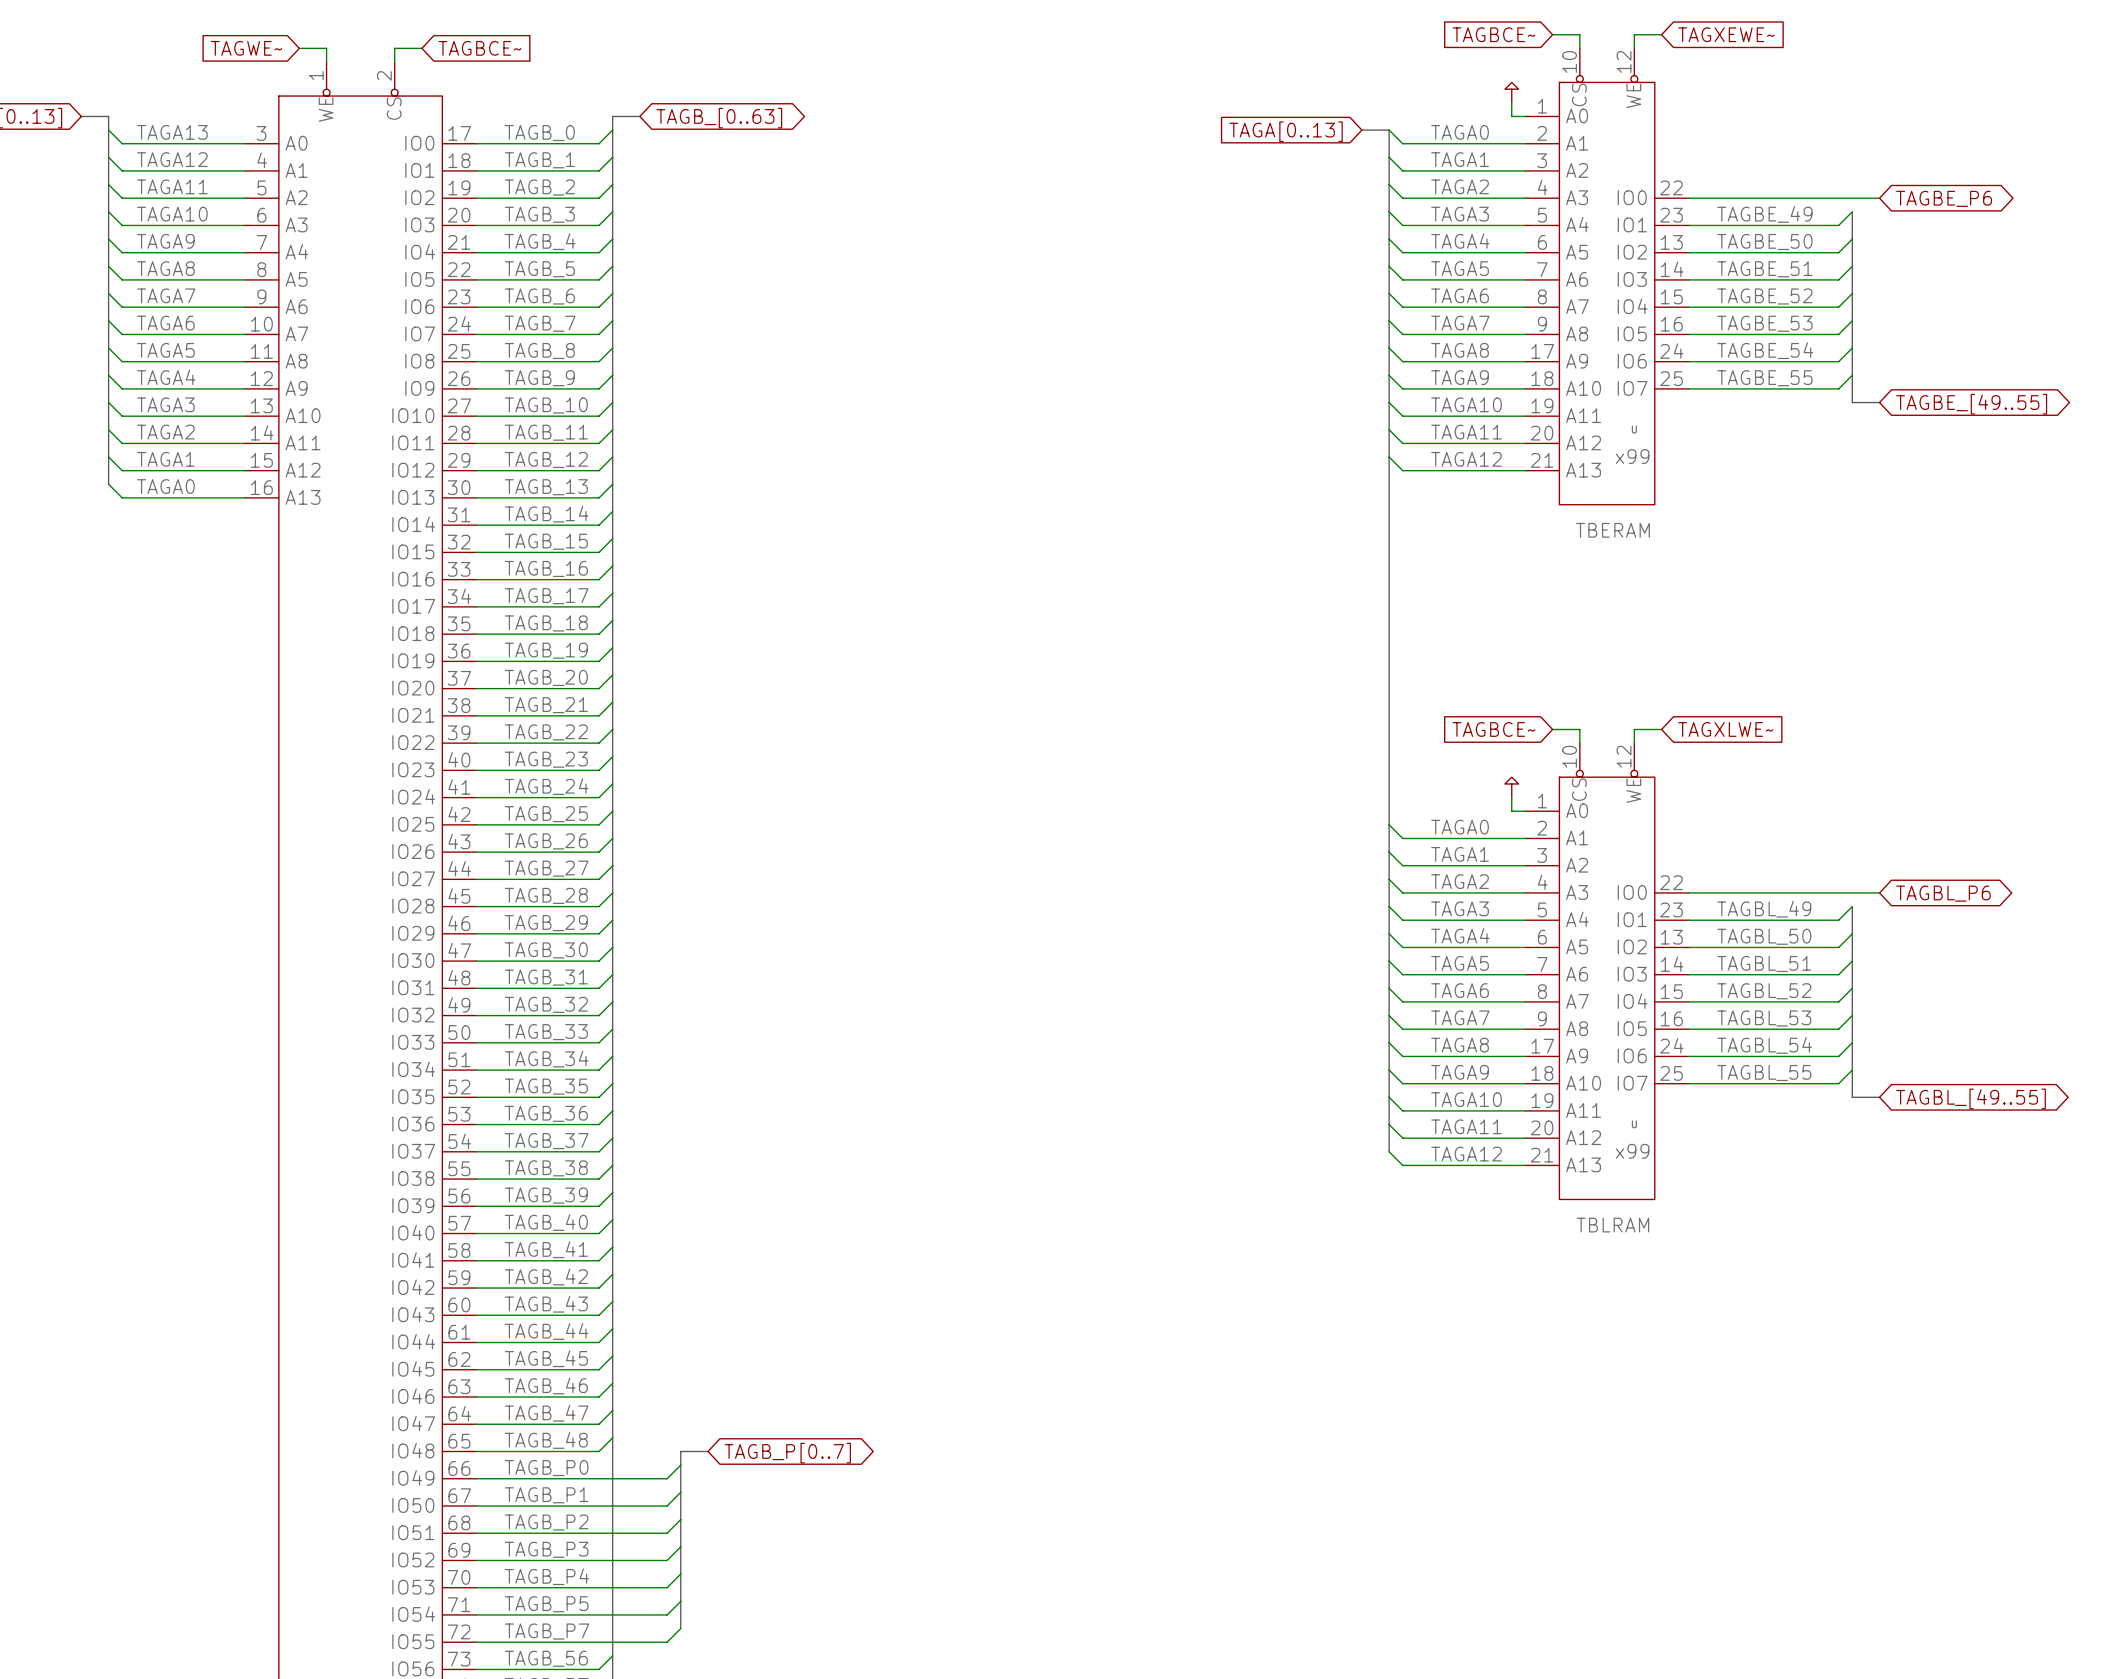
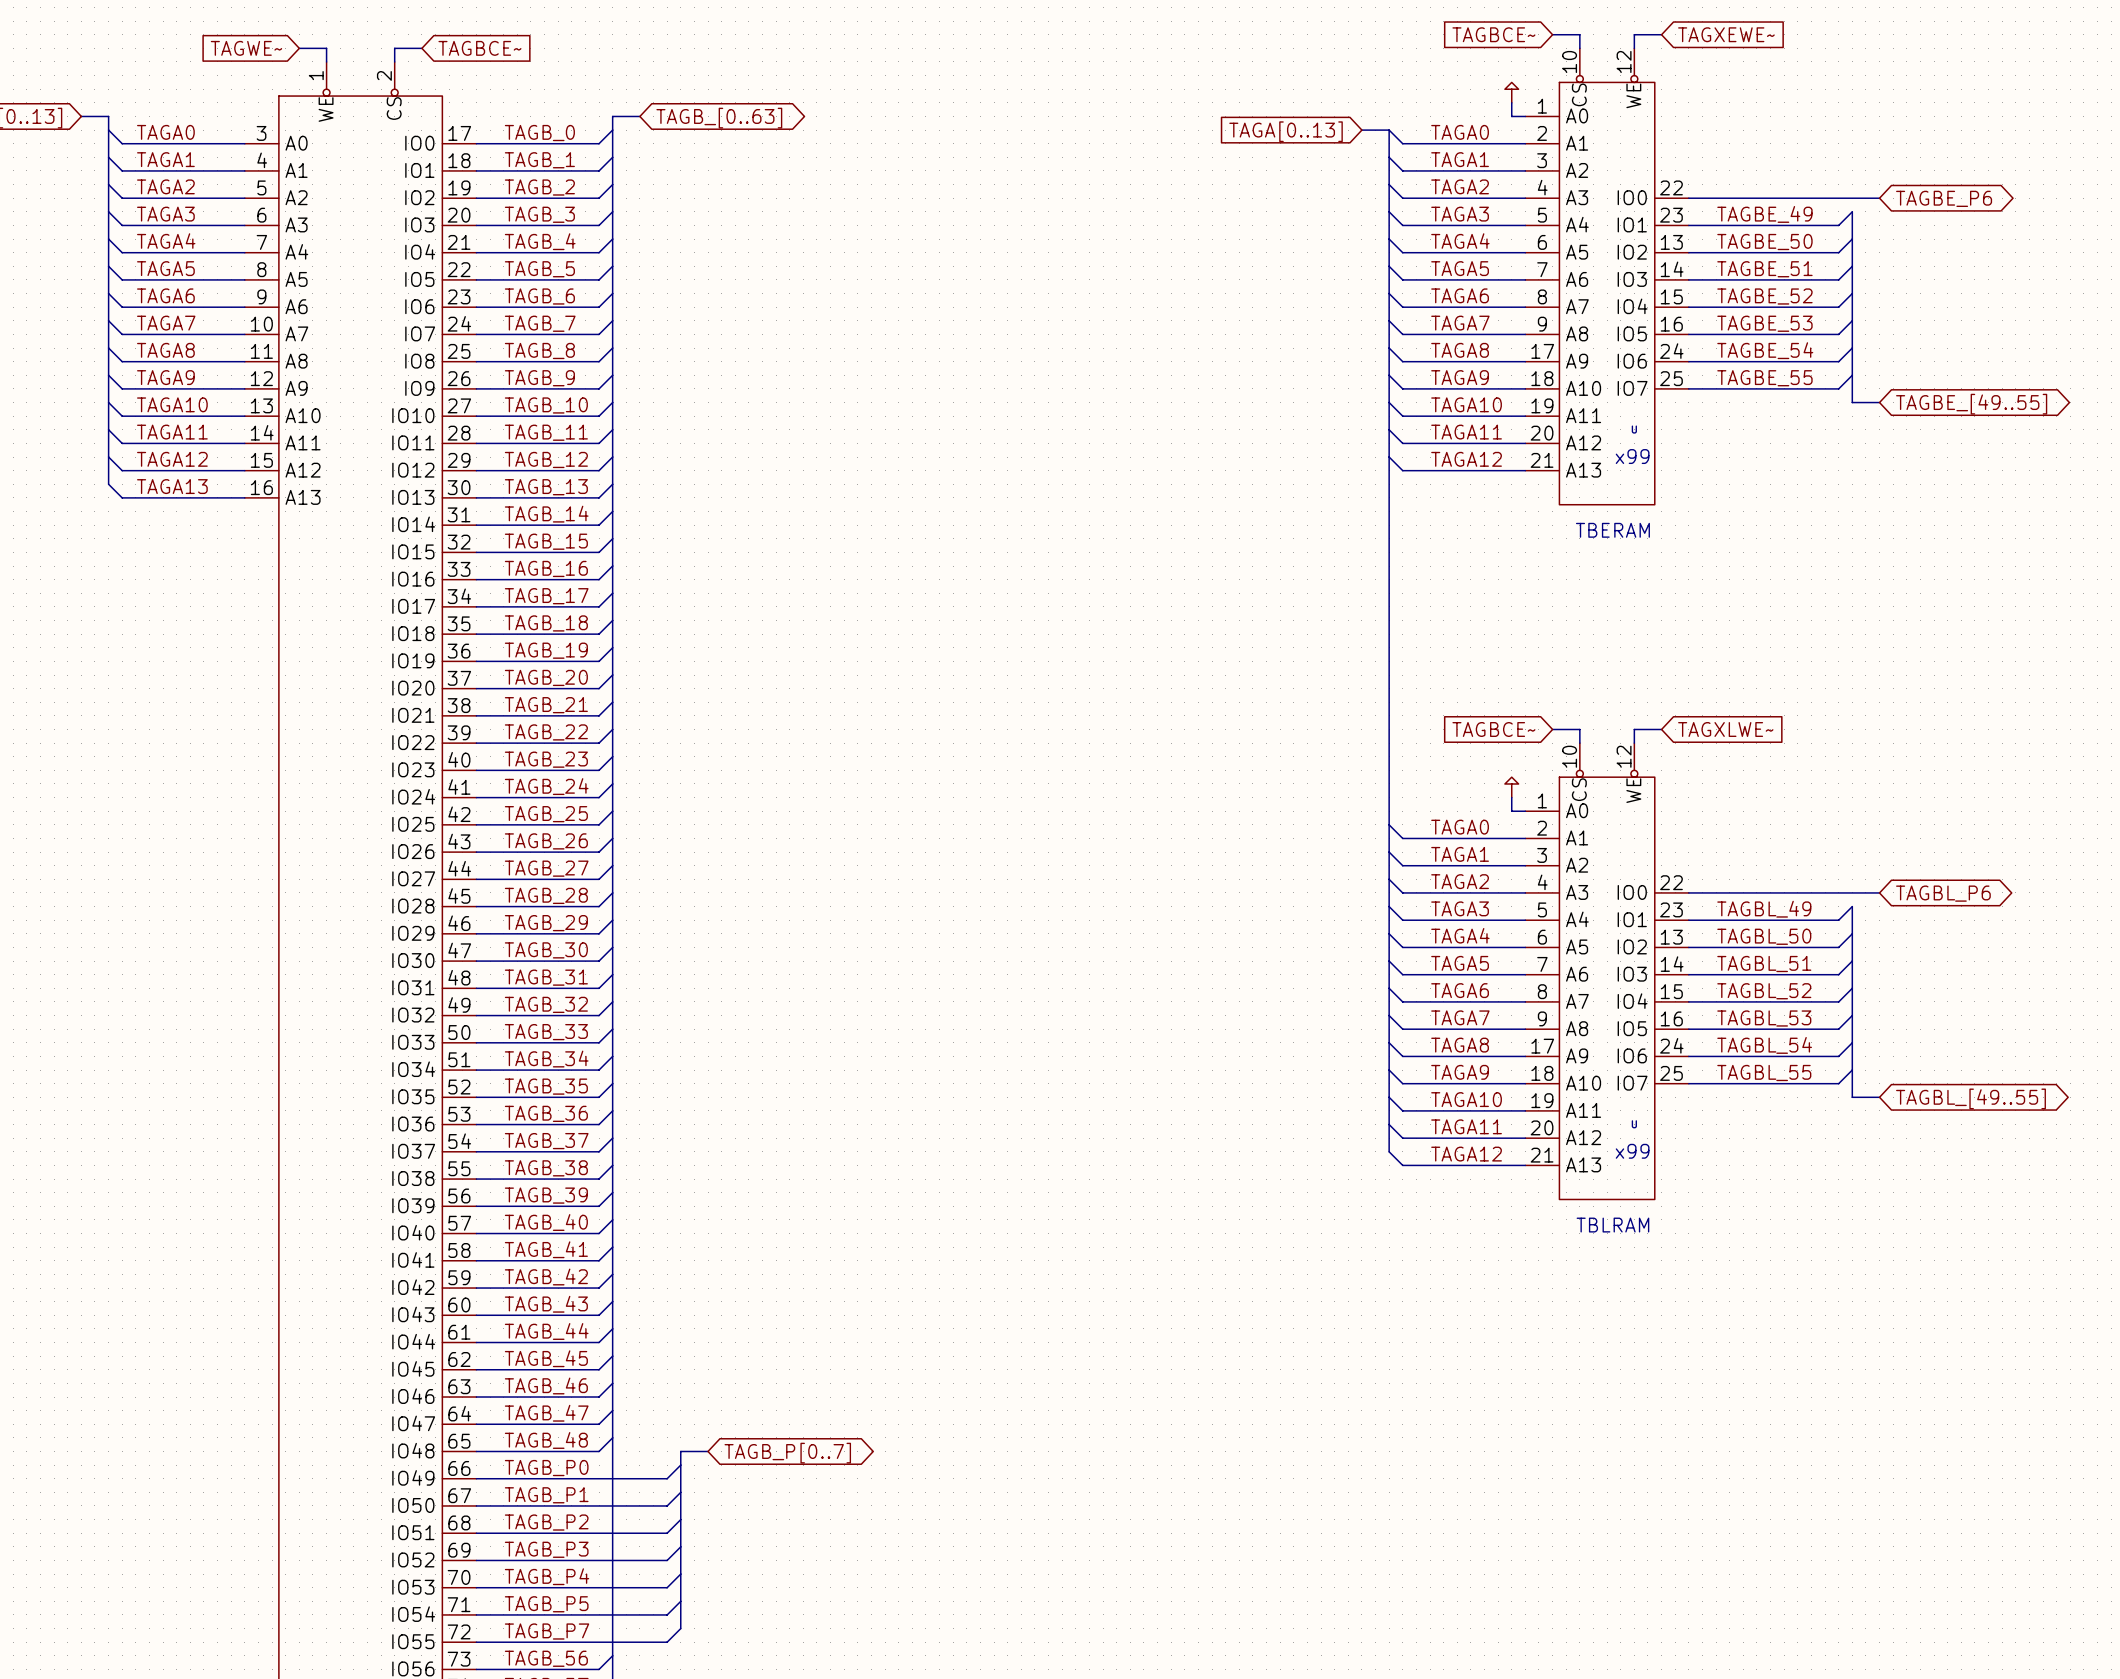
label: TAGA13 (172, 132) -> TAGA0 (165, 132)
label: TAGA12 (172, 159) -> TAGA1 (165, 159)
label: TAGA11 (172, 186) -> TAGA2 (165, 186)
label: TAGA10 (172, 214) -> TAGA3 (165, 214)
label: TAGA9 (165, 241) -> TAGA4 (166, 241)
label: TAGA8 (165, 268) -> TAGA5 (165, 268)
label: TAGA7 (166, 295) -> TAGA6 (165, 295)
label: TAGA6 (165, 323) -> TAGA7 (166, 323)
label: TAGA5 (165, 350) -> TAGA8 (165, 350)
label: TAGA4 (166, 377) -> TAGA9 (165, 377)
label: TAGA3 (165, 404) -> TAGA10 (172, 404)
label: TAGA2 (165, 432) -> TAGA11 (172, 432)
label: TAGA1 (165, 459) -> TAGA12 (172, 459)
label: TAGA0 (165, 486) -> TAGA13 (172, 486)

